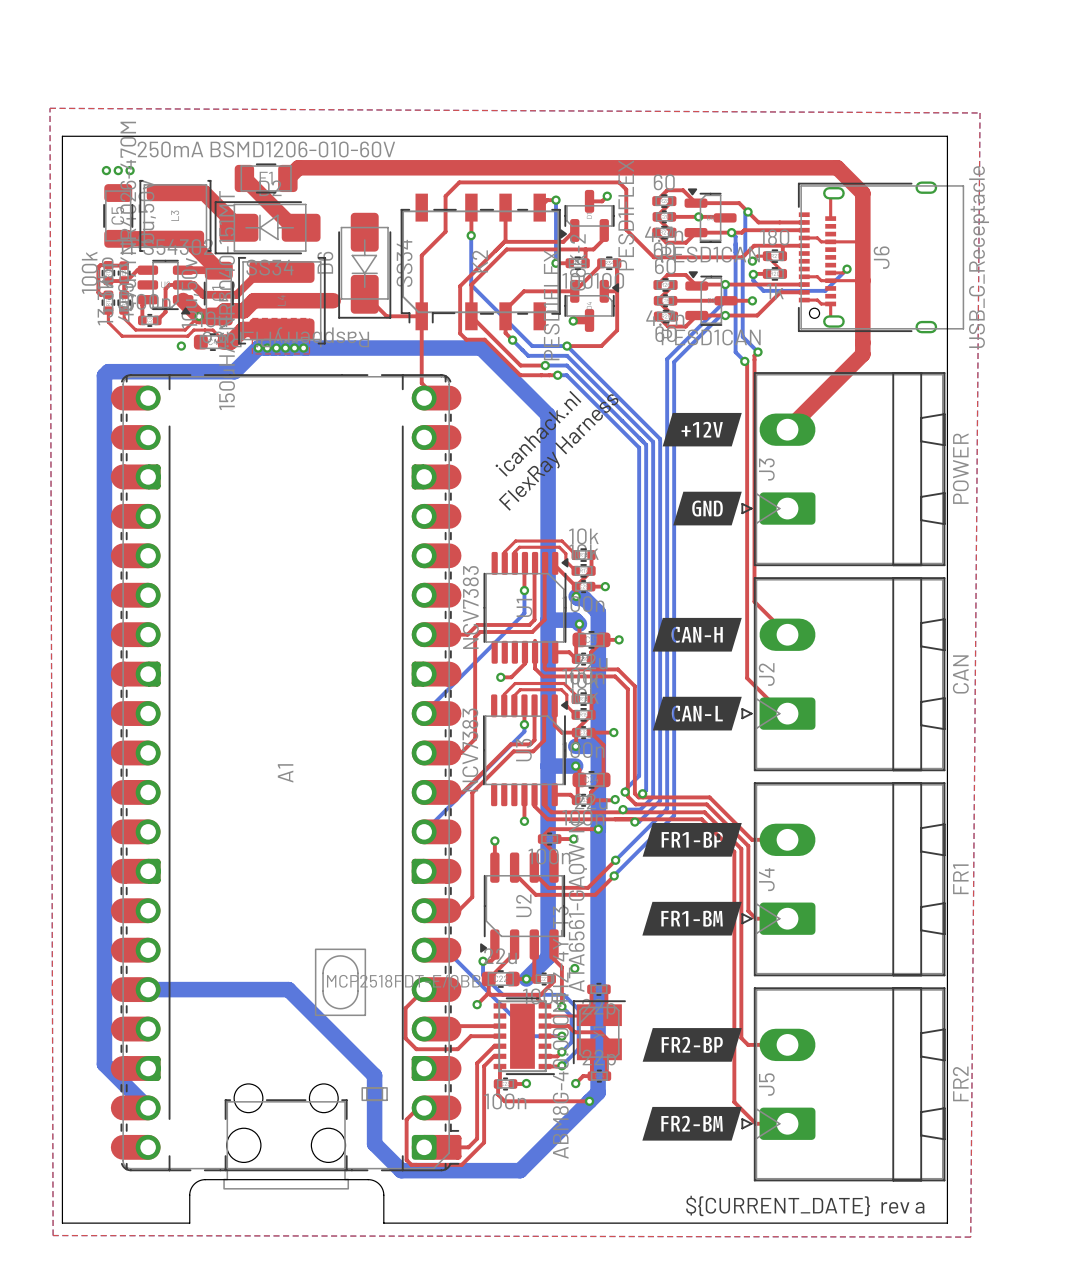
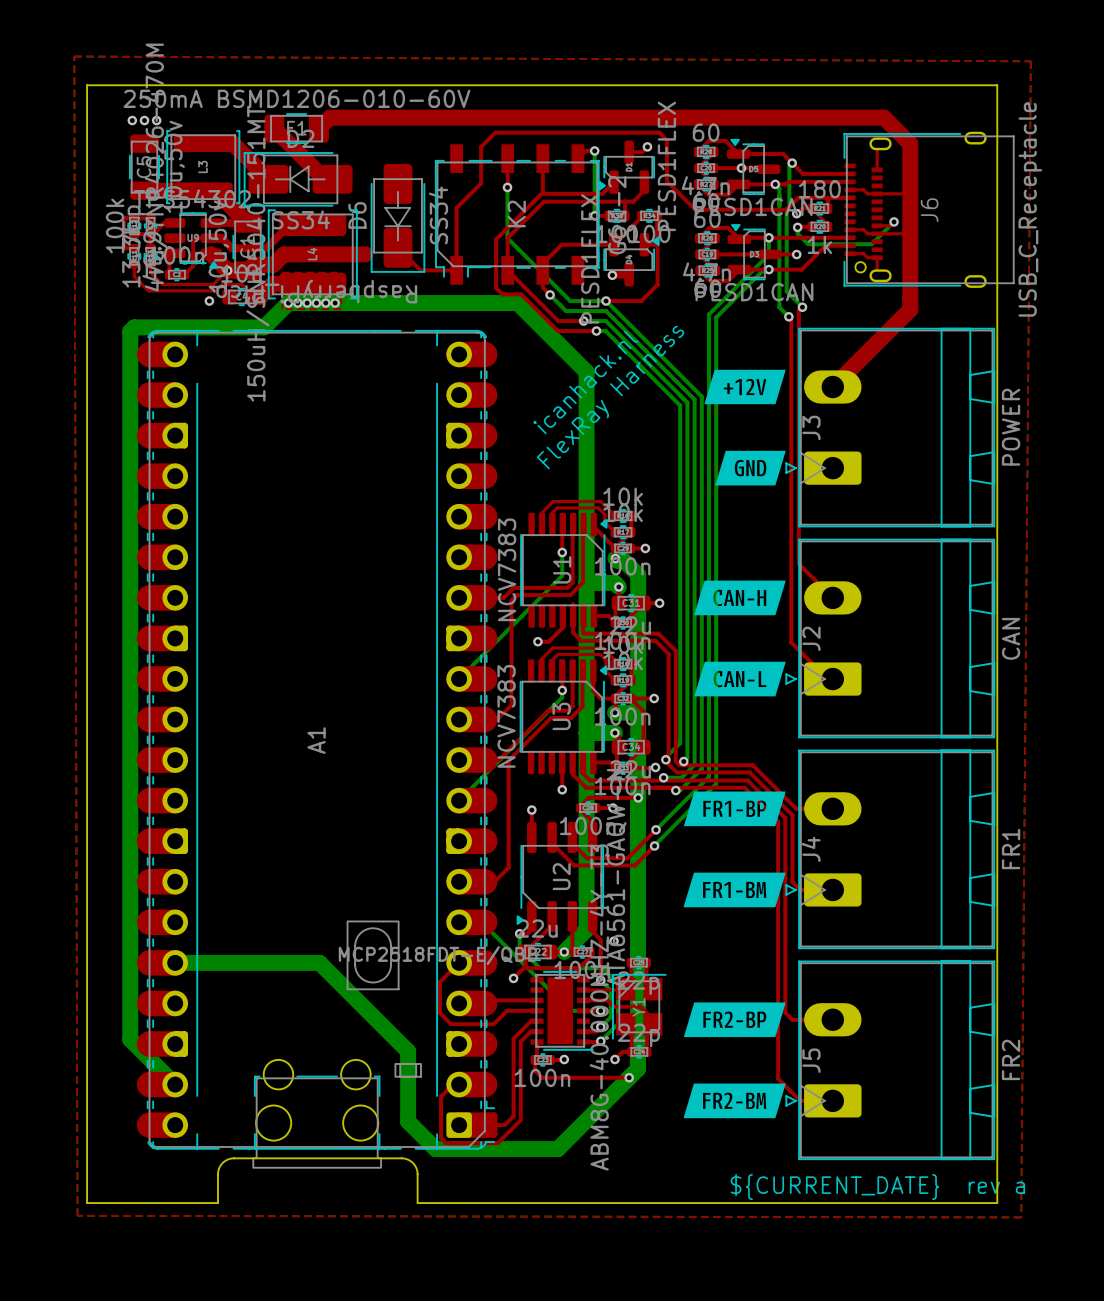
top track: (424, 318) (421, 316) (421, 383) (436, 398) -> none

